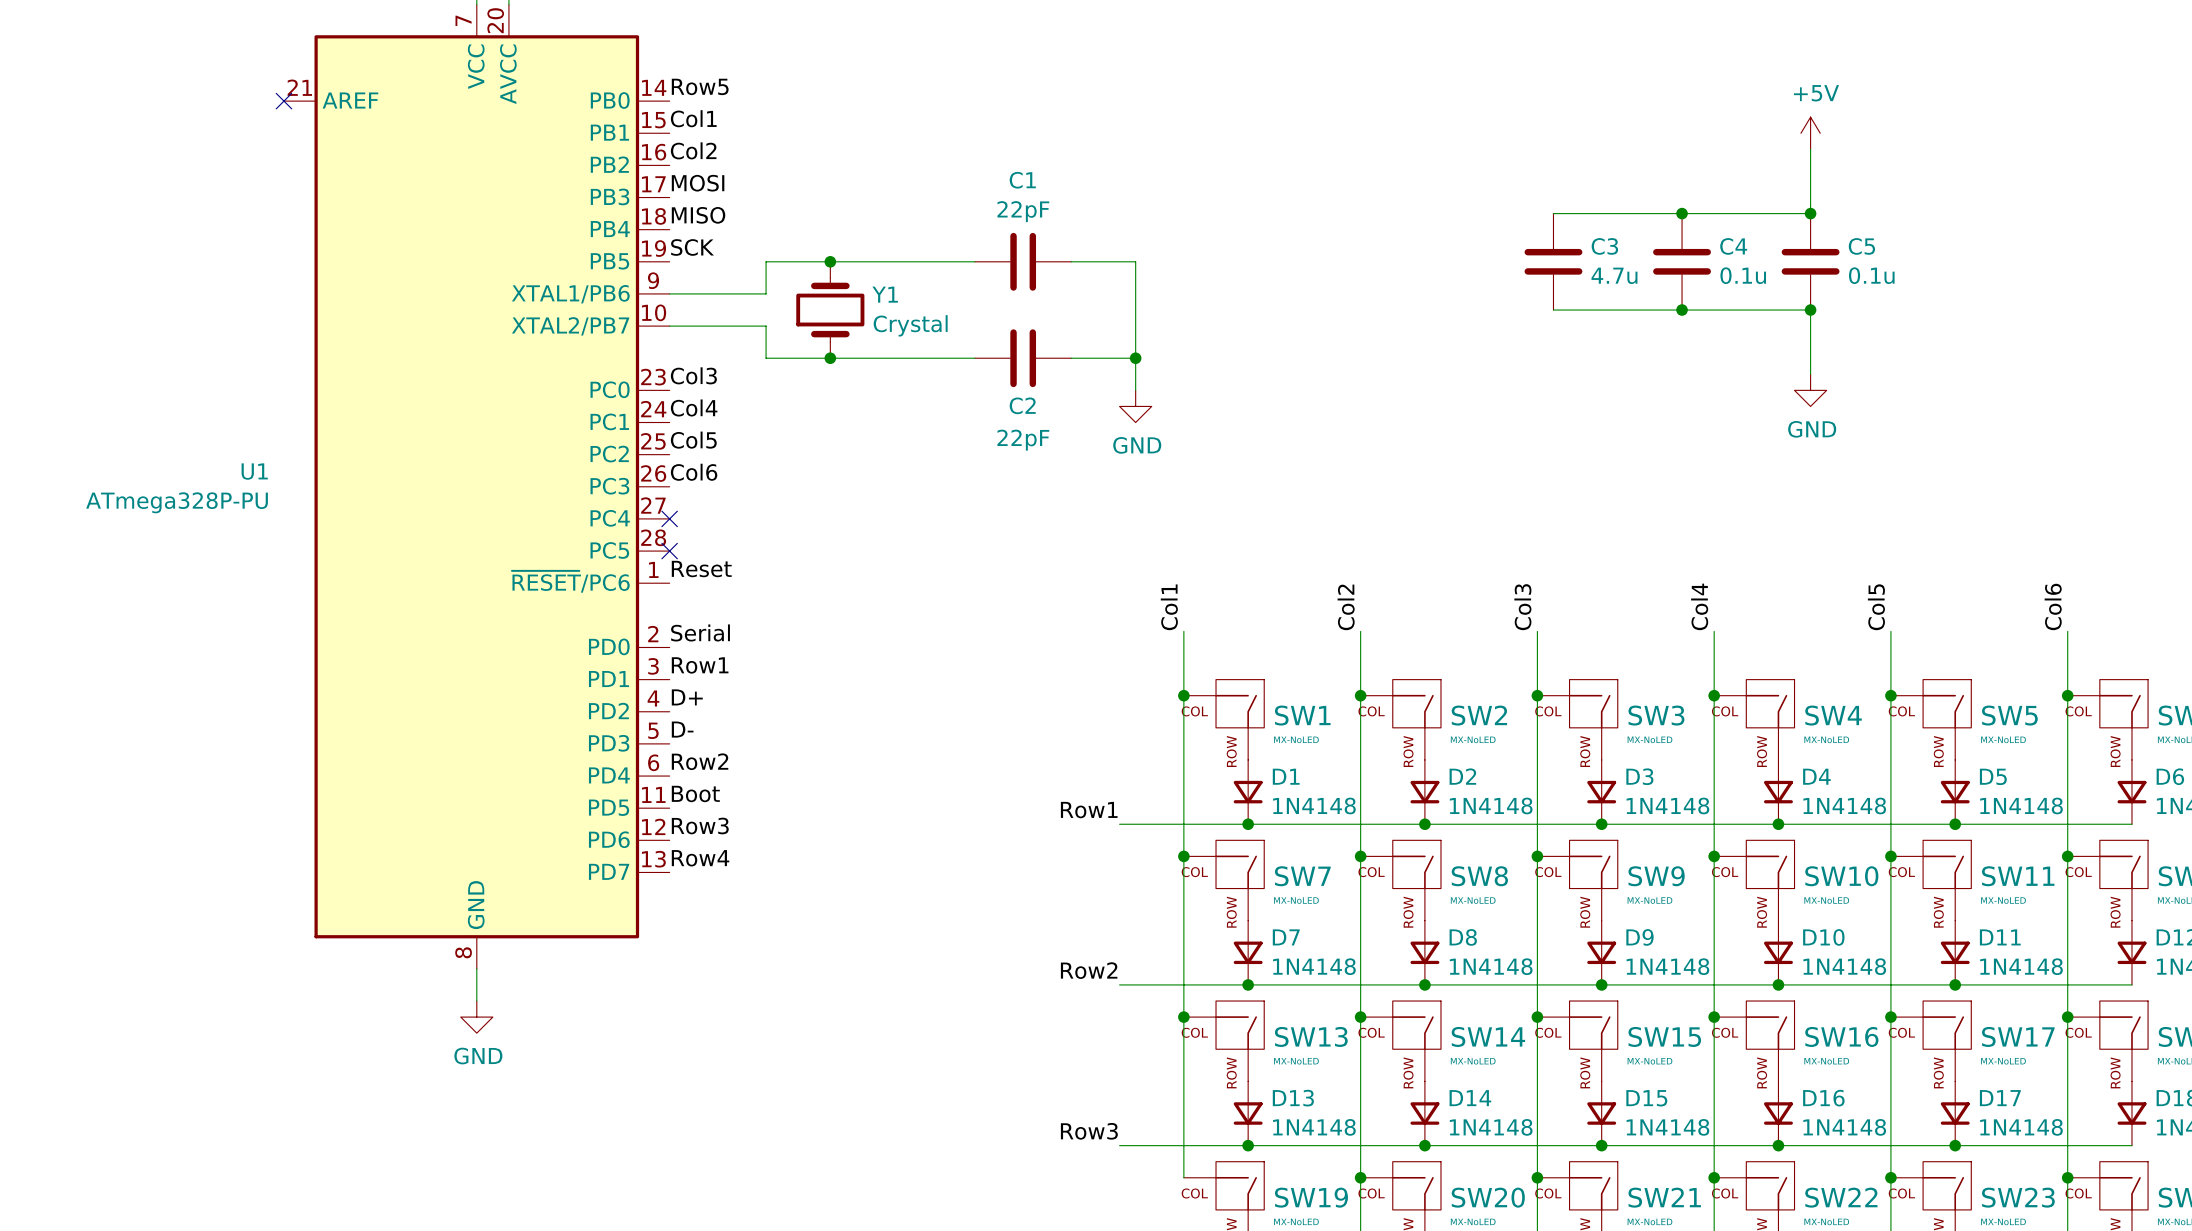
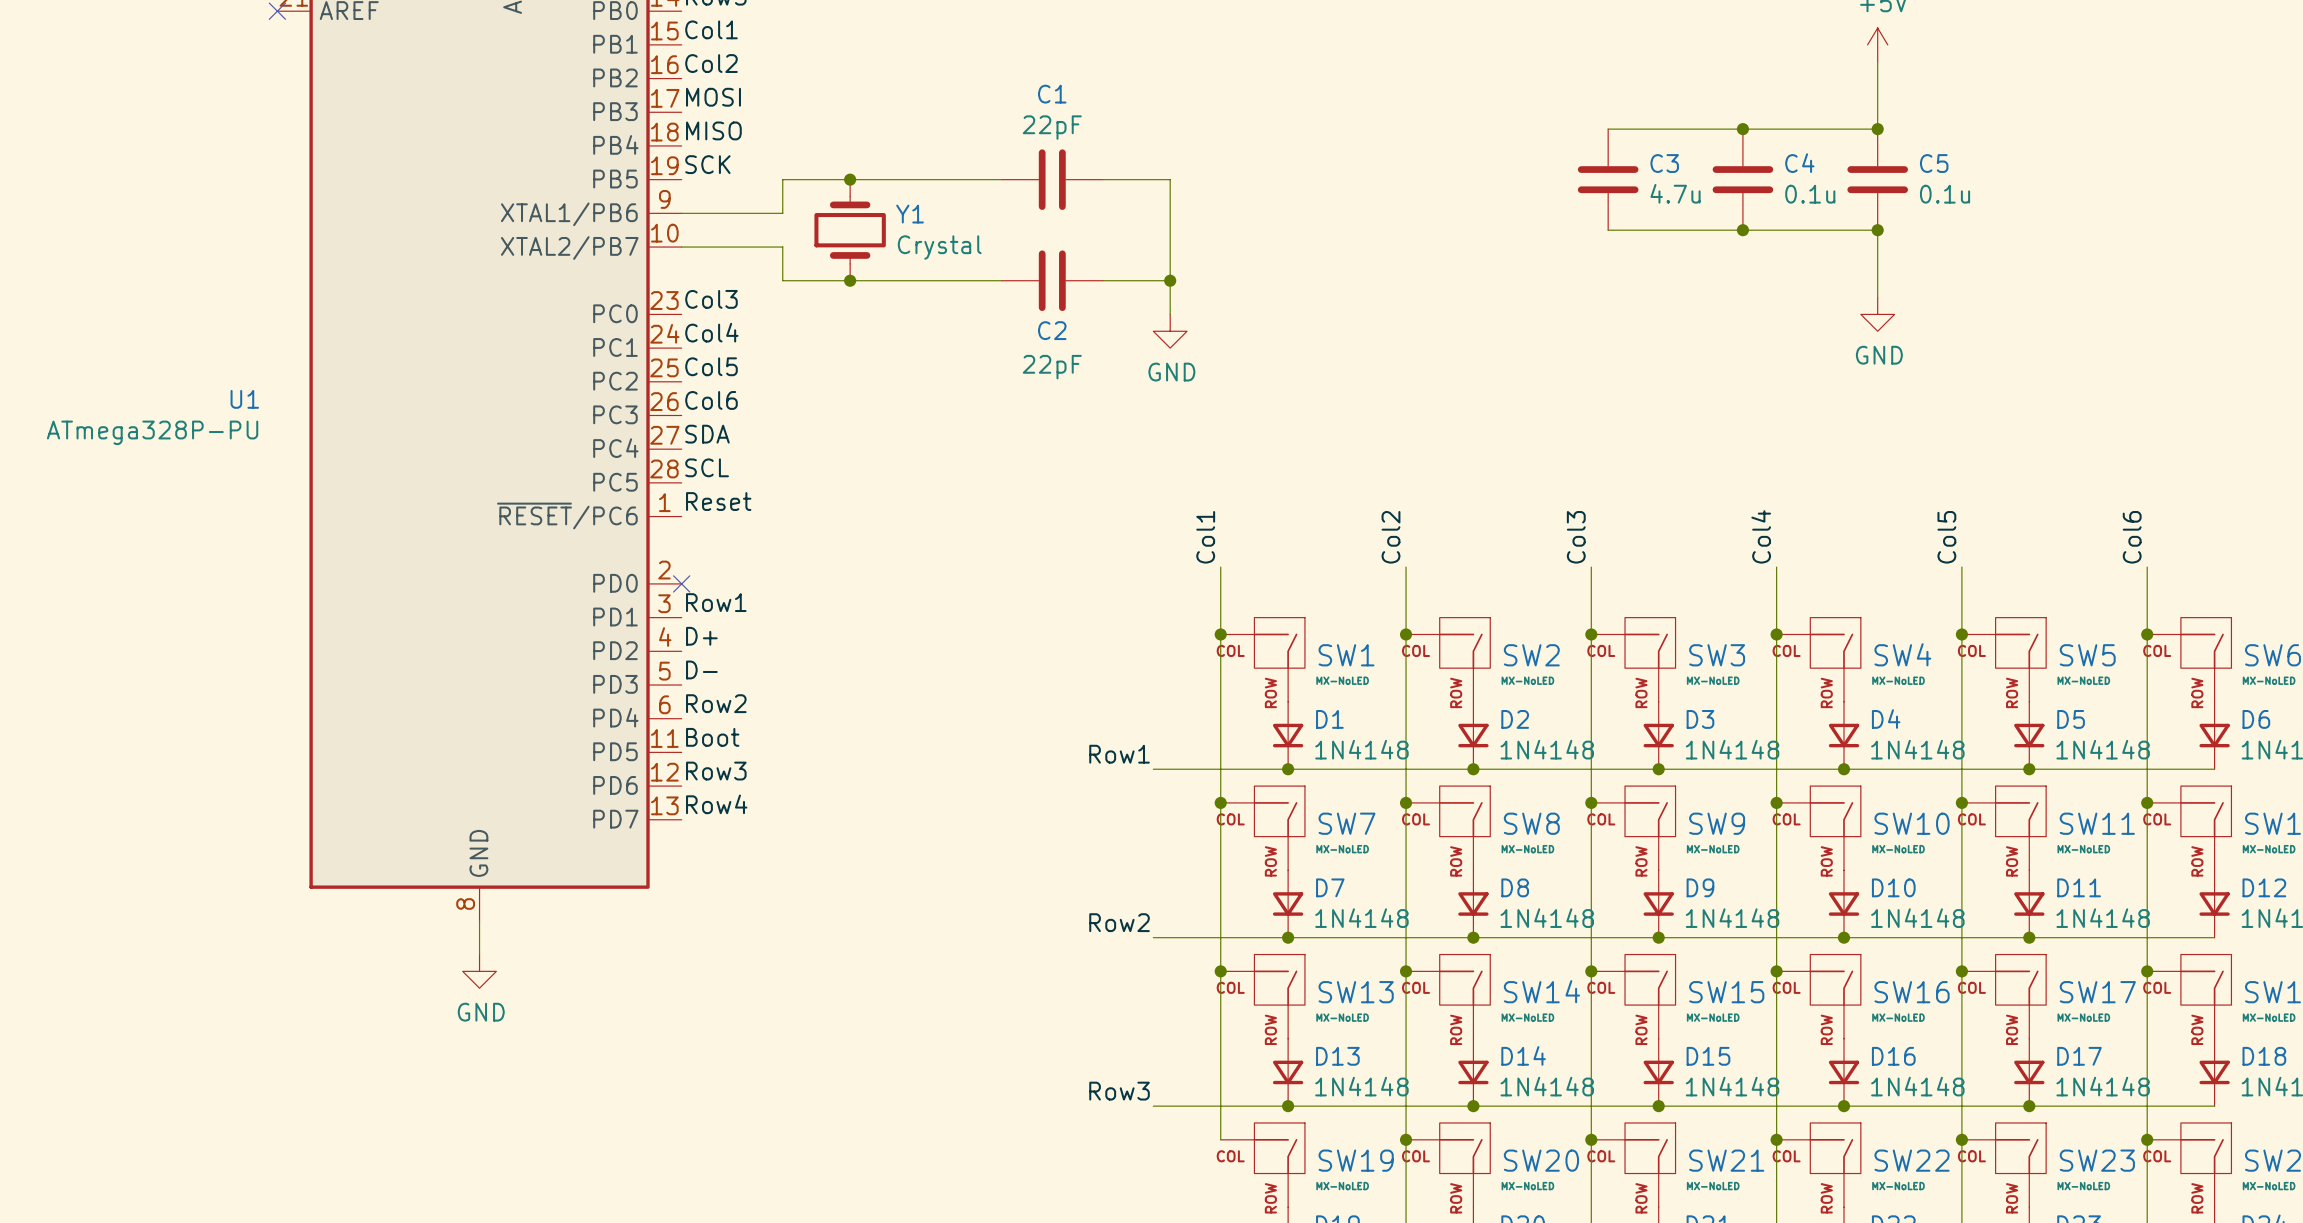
label: none -> SDA (707, 434)
no-connect mark: (669, 518) -> none
label: none -> SCL (707, 467)
no-connect mark: (669, 551) -> none
label: Serial (700, 632) -> none
no-connect mark: none -> (681, 583)

